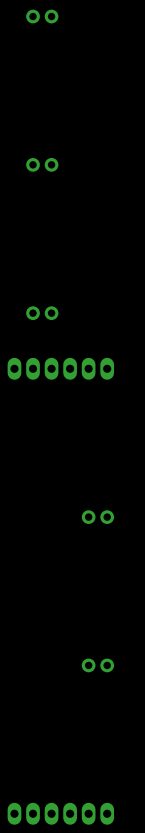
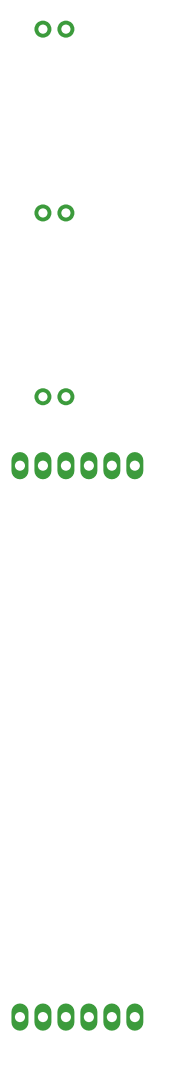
part: (97, 517) -> none
part: (97, 665) -> none

